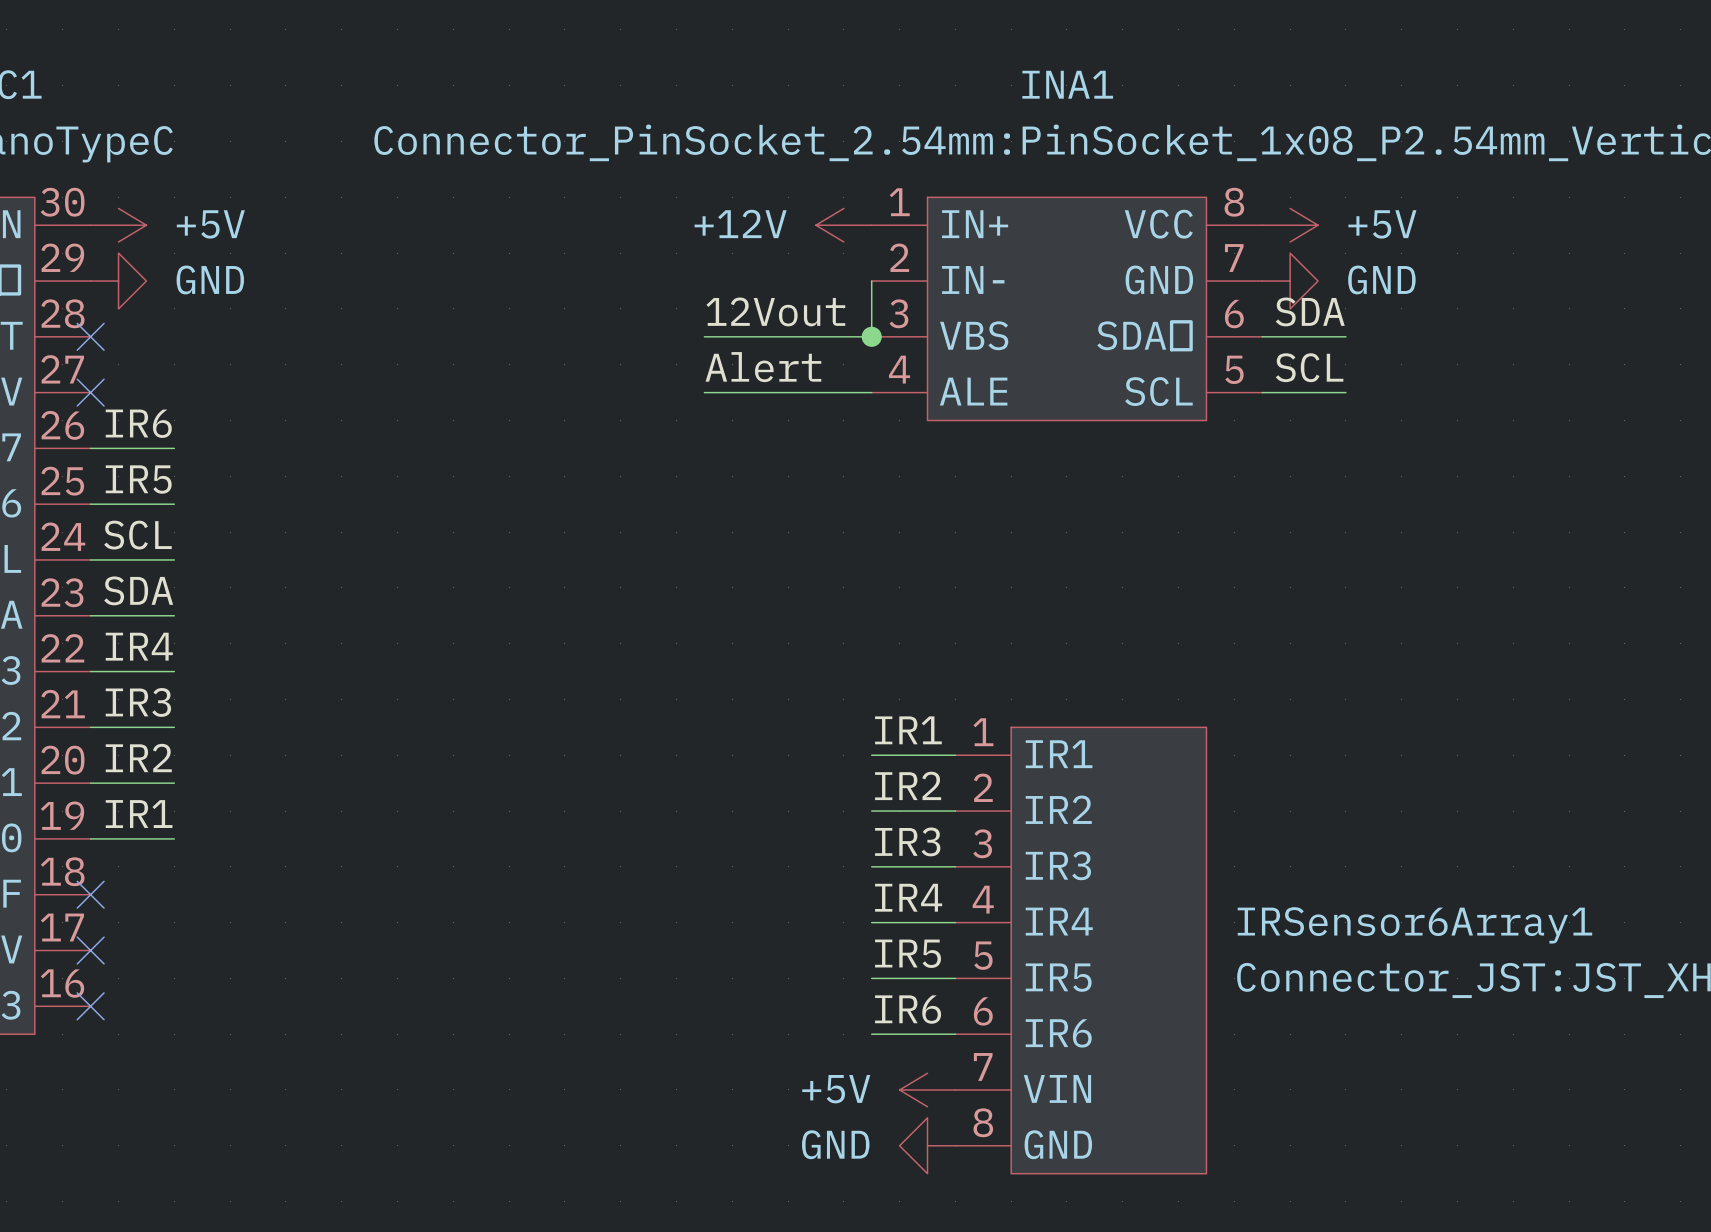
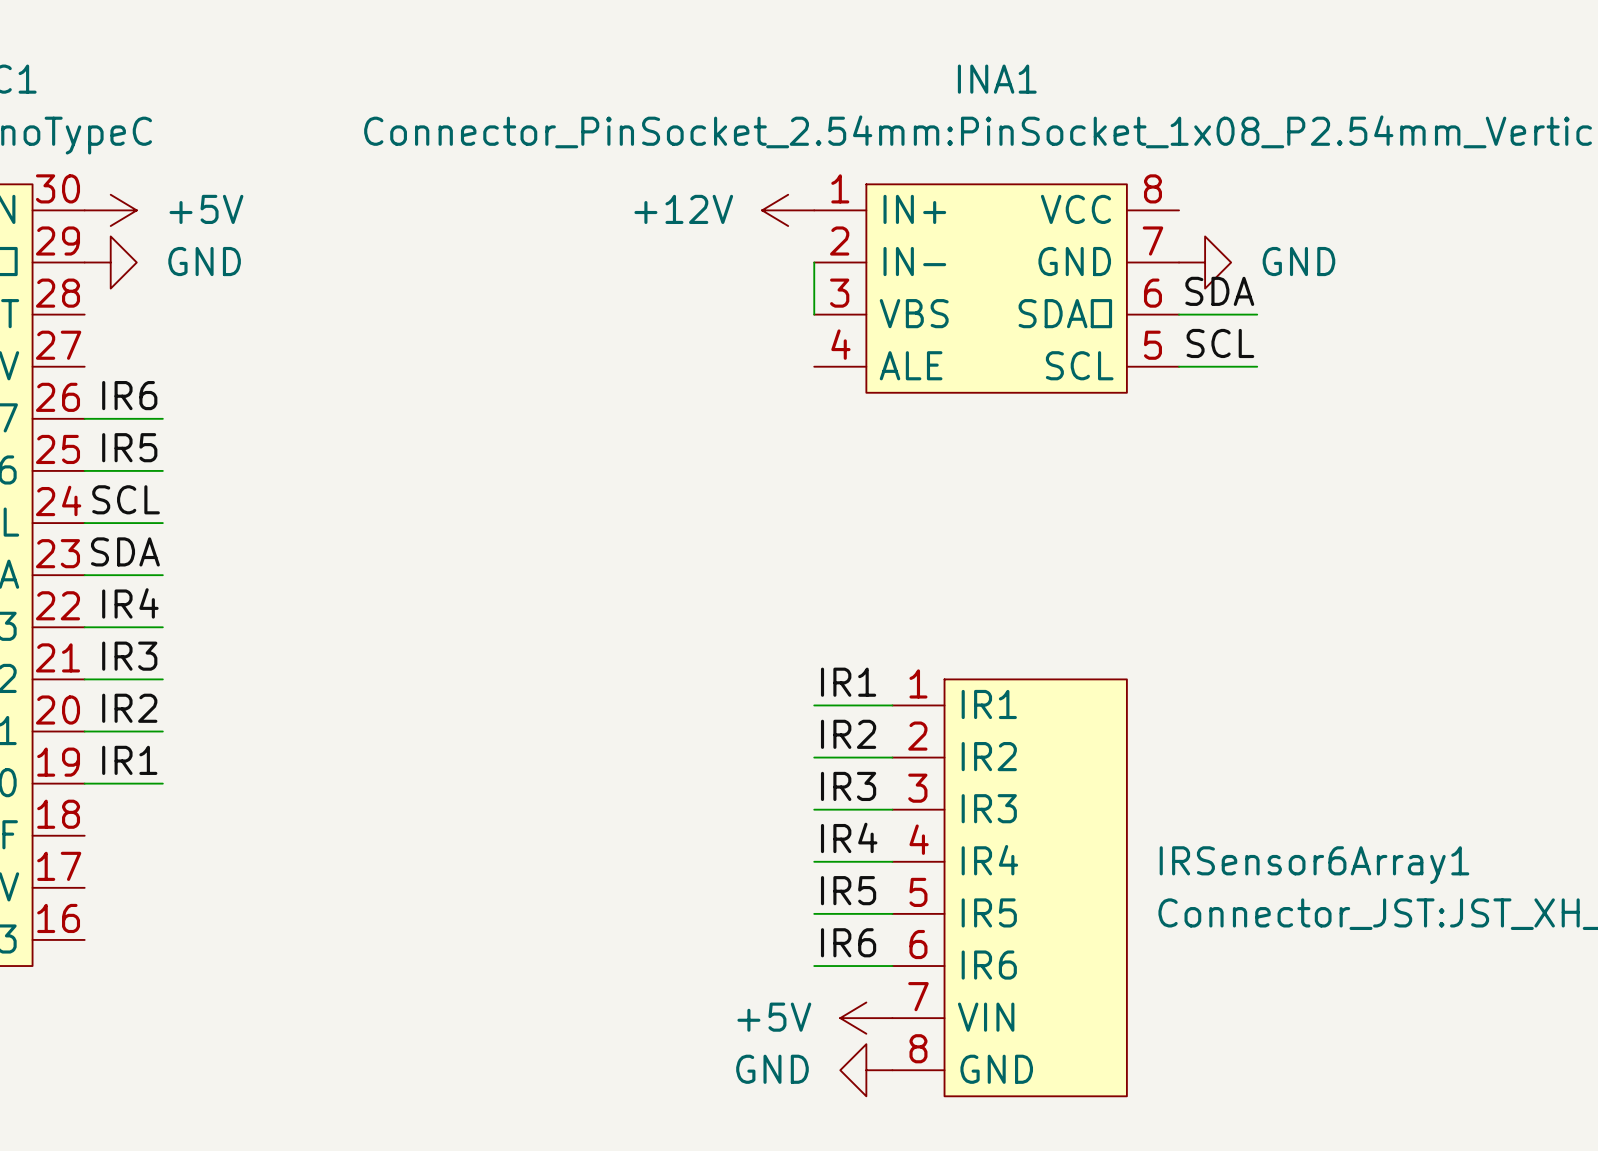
power symbol: +5V (1290, 225) -> none
label: 12Vout (775, 311) -> none
no-connect mark: (90, 336) -> none
wire: (704, 336) (871, 336) -> none
junction: (871, 336) -> none
label: Alert (763, 367) -> none
no-connect mark: (90, 392) -> none
wire: (704, 392) (871, 392) -> none
no-connect mark: (90, 894) -> none
no-connect mark: (90, 950) -> none
no-connect mark: (90, 1006) -> none

